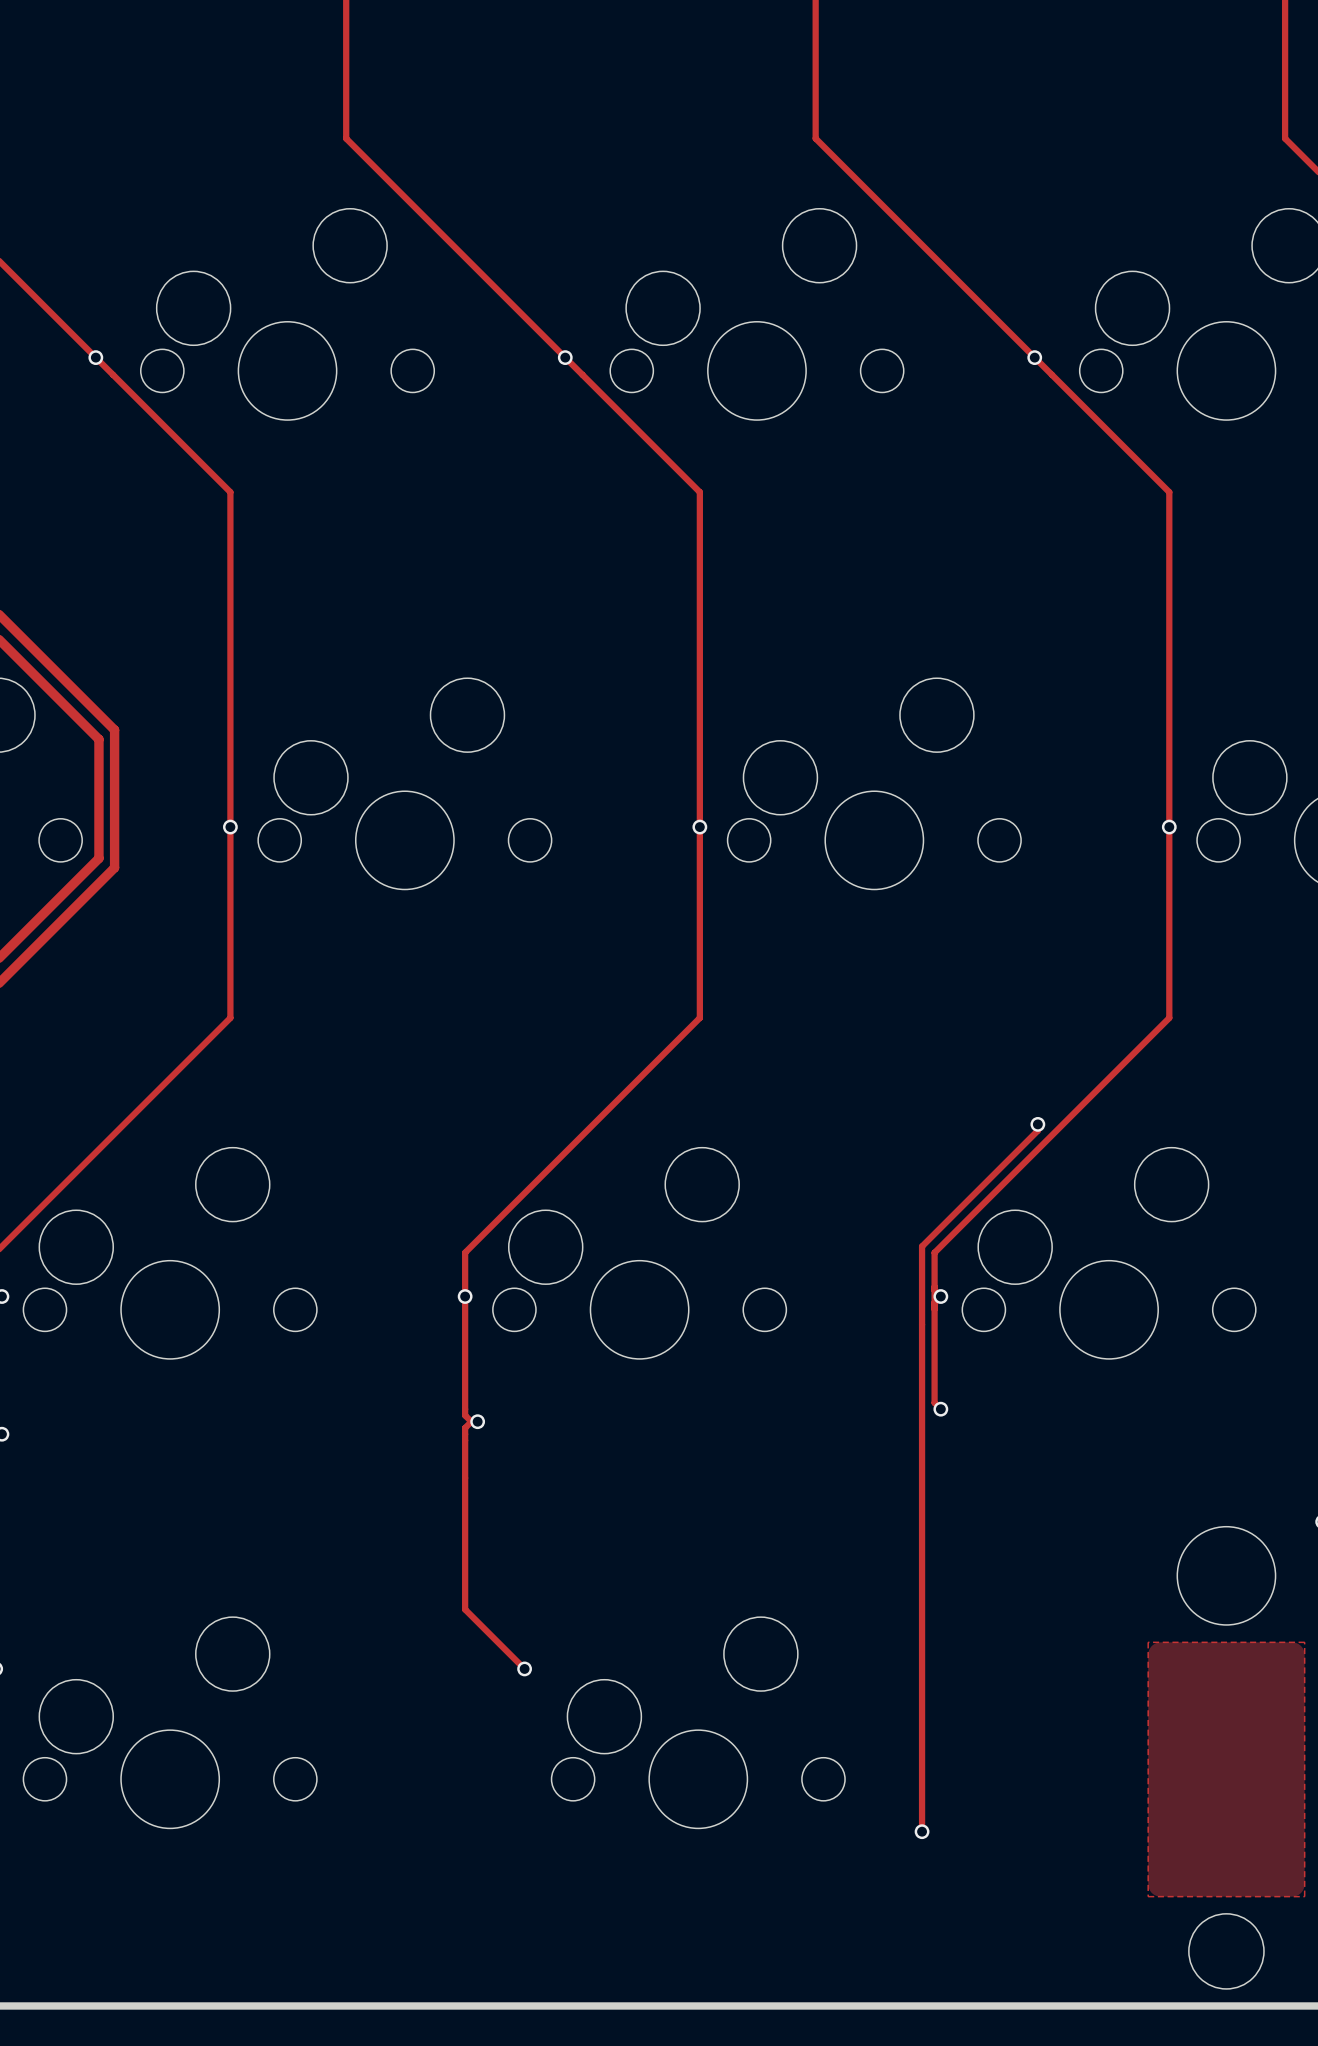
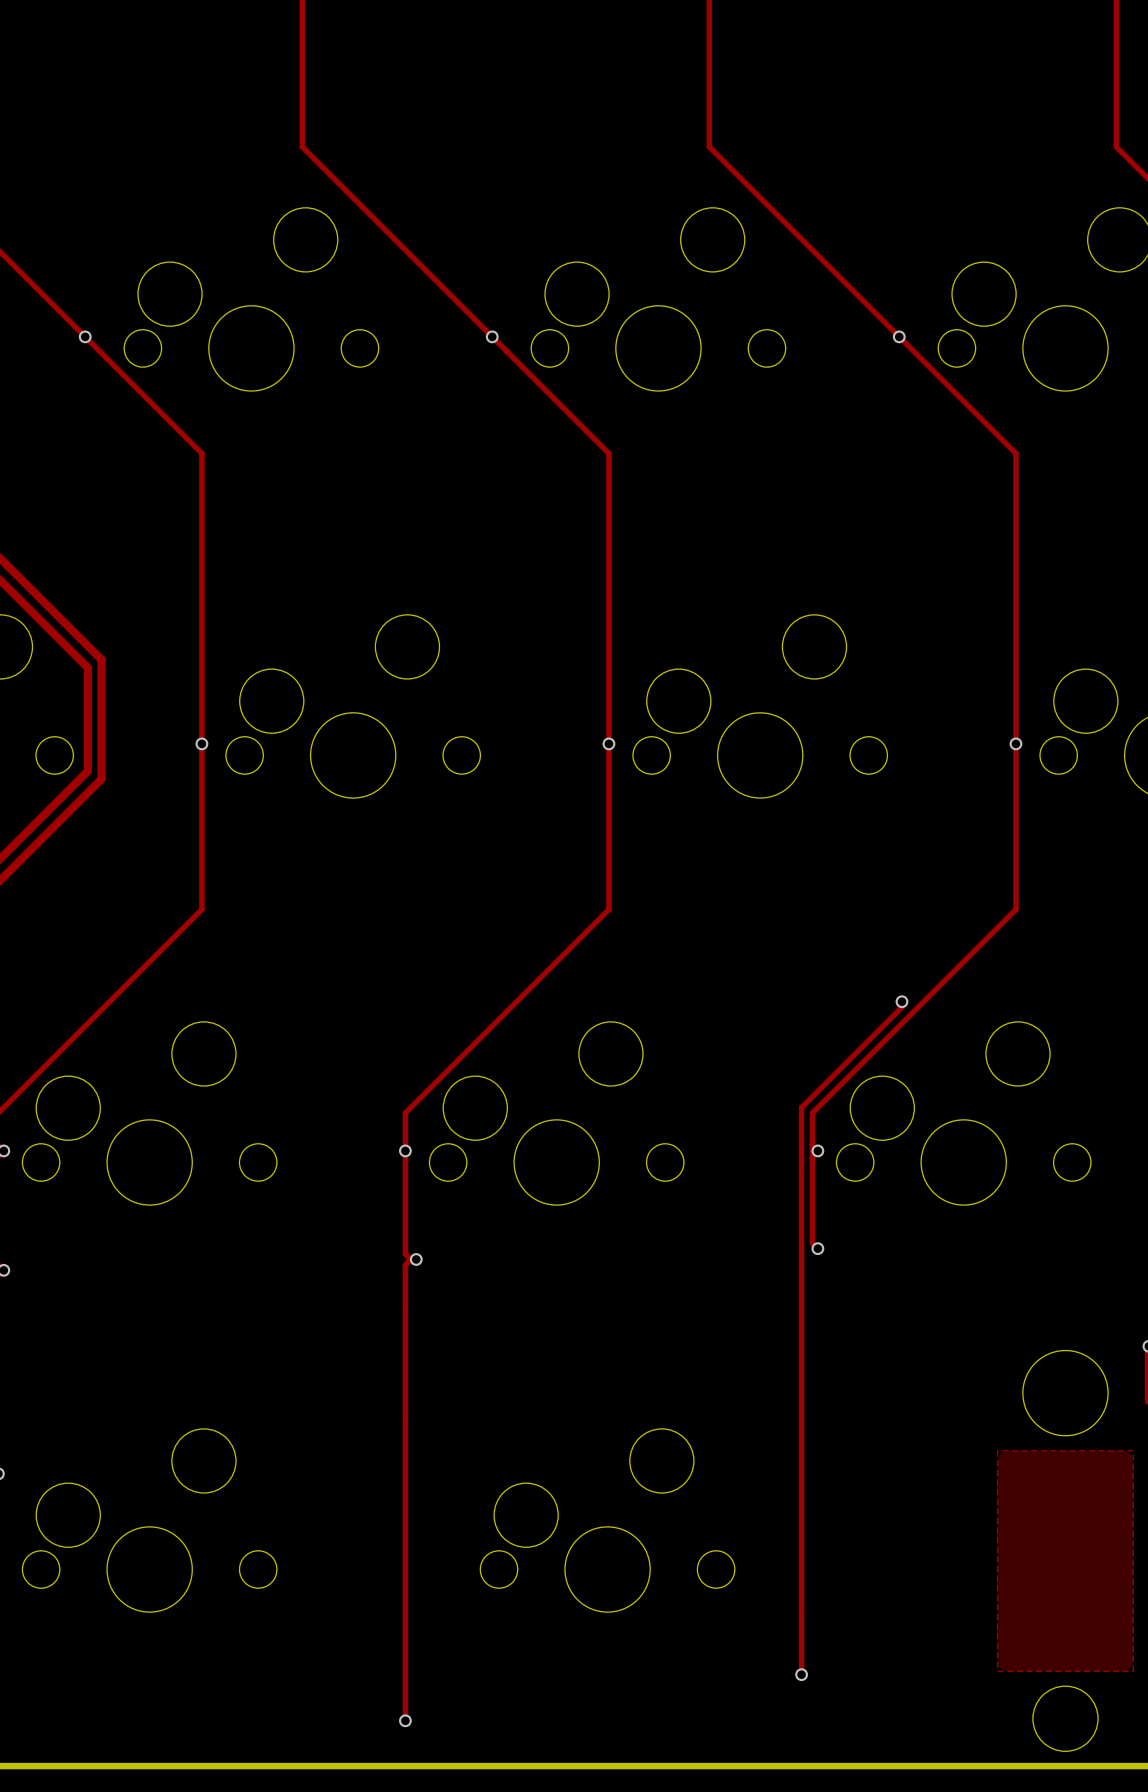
track: (465, 1609) (524, 1668) -> (405, 1422) (405, 1720)
via: (524, 1668) -> none
track: none -> (801, 1614) (801, 1674)
via position: (922, 1831) -> (801, 1674)
via: none -> (405, 1720)

